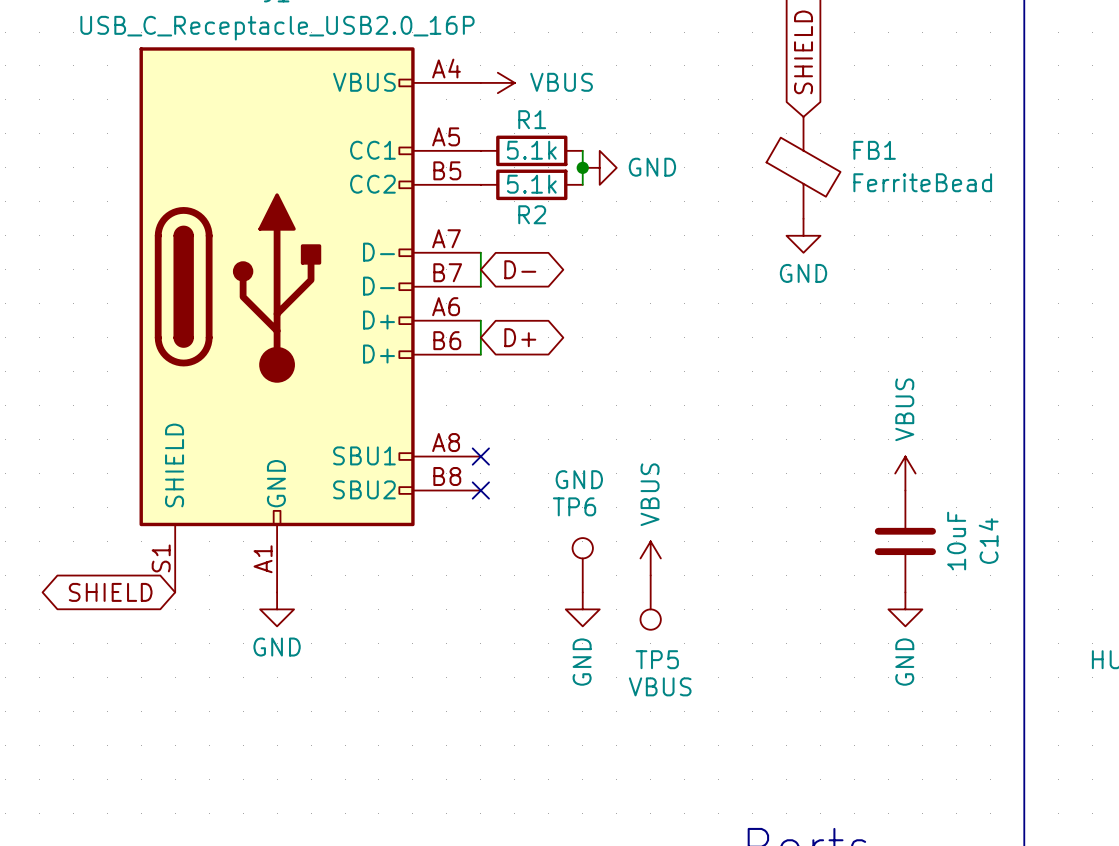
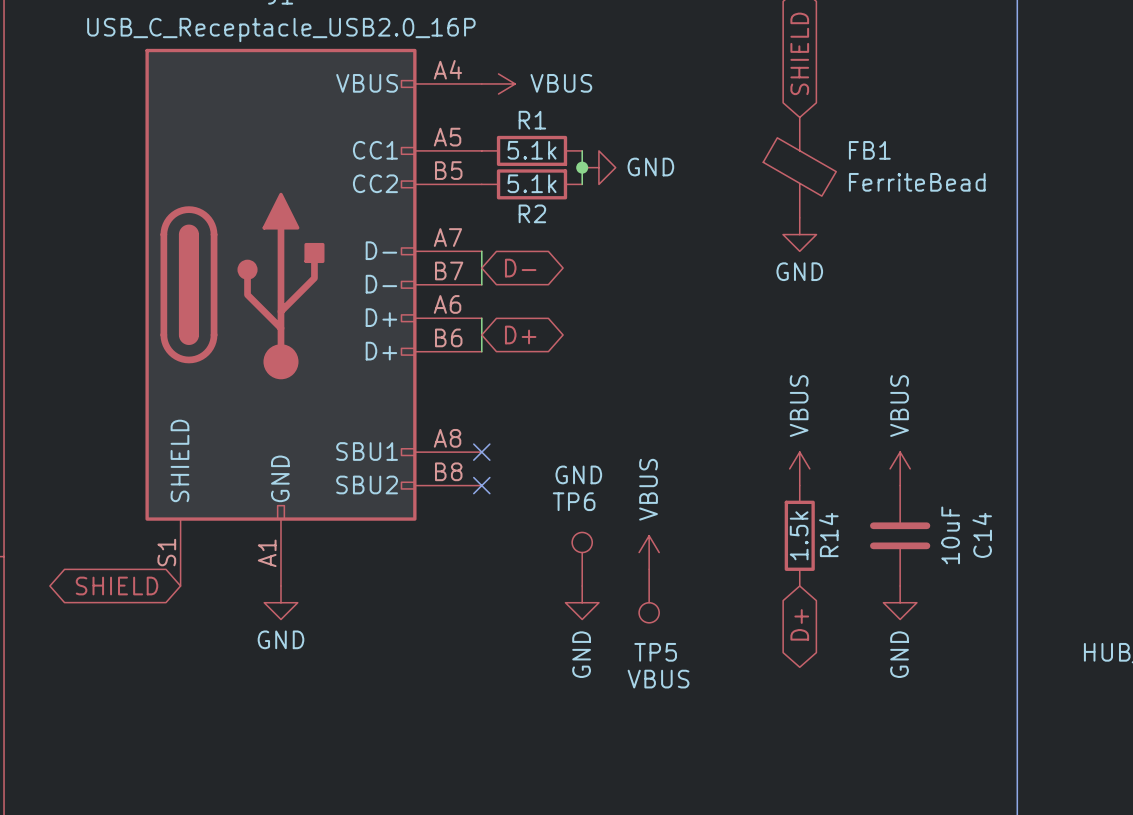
power symbol: none -> VBUS (799, 468)
R14: none -> 1.5k (799, 535)
global label: none -> D+ (799, 624)

